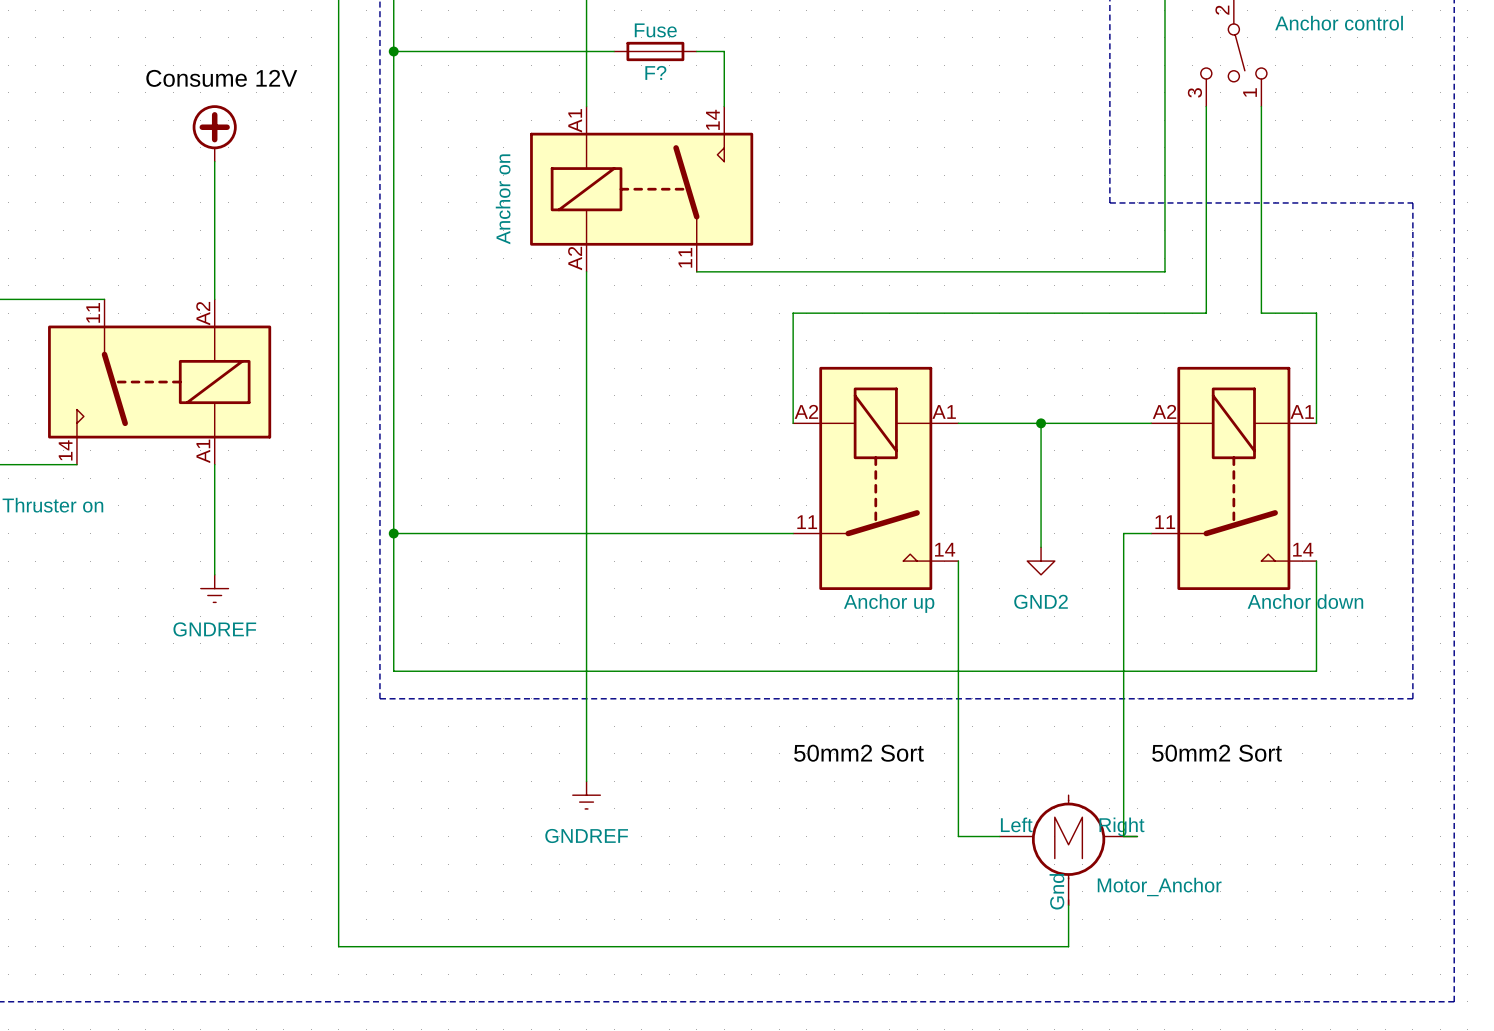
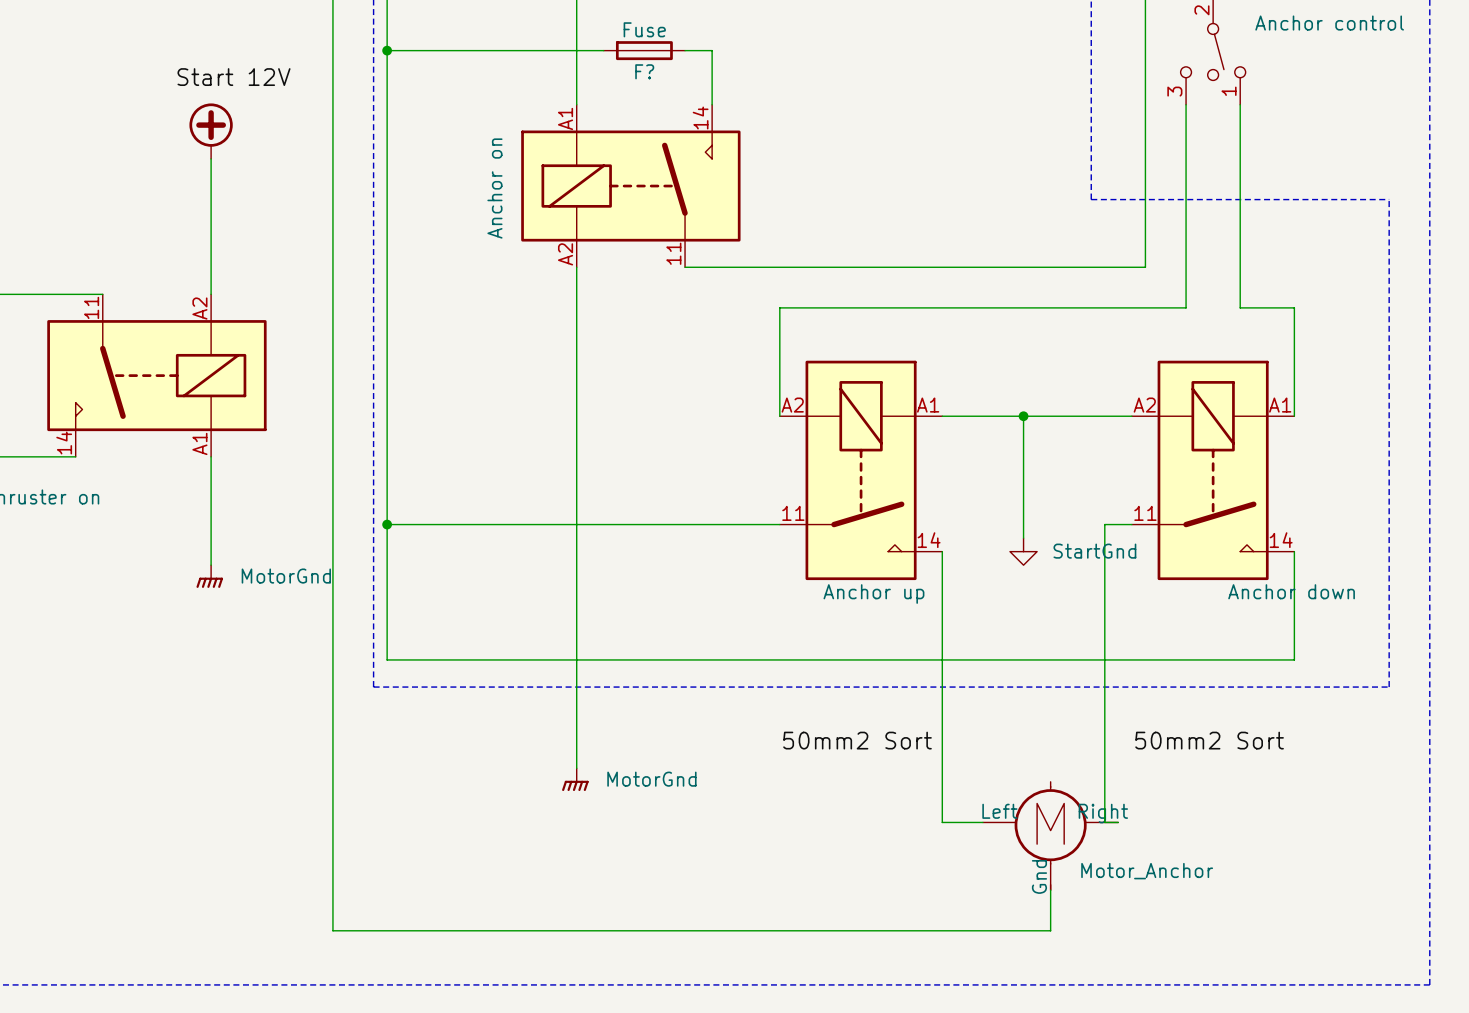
label: Consume 12V (221, 78) -> Start 12V (234, 77)
power symbol: GND2 (1041, 561) -> StartGnd (1023, 551)
power symbol: GNDREF (214, 588) -> MotorGnd (209, 576)
power symbol: GNDREF (586, 795) -> MotorGnd (575, 779)

